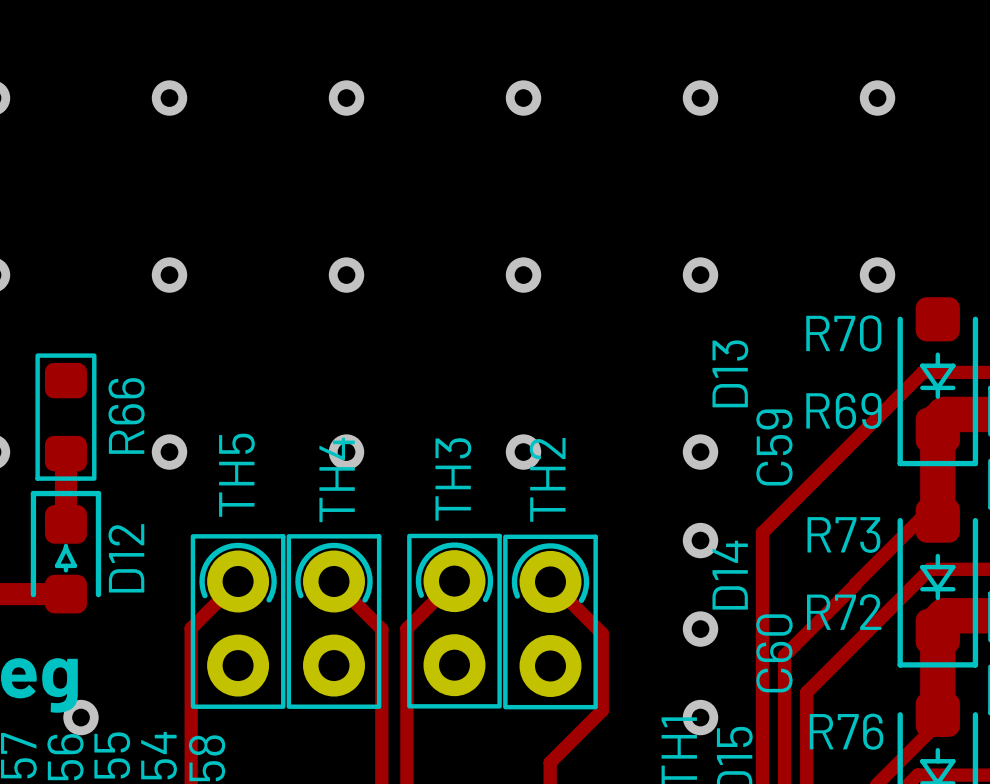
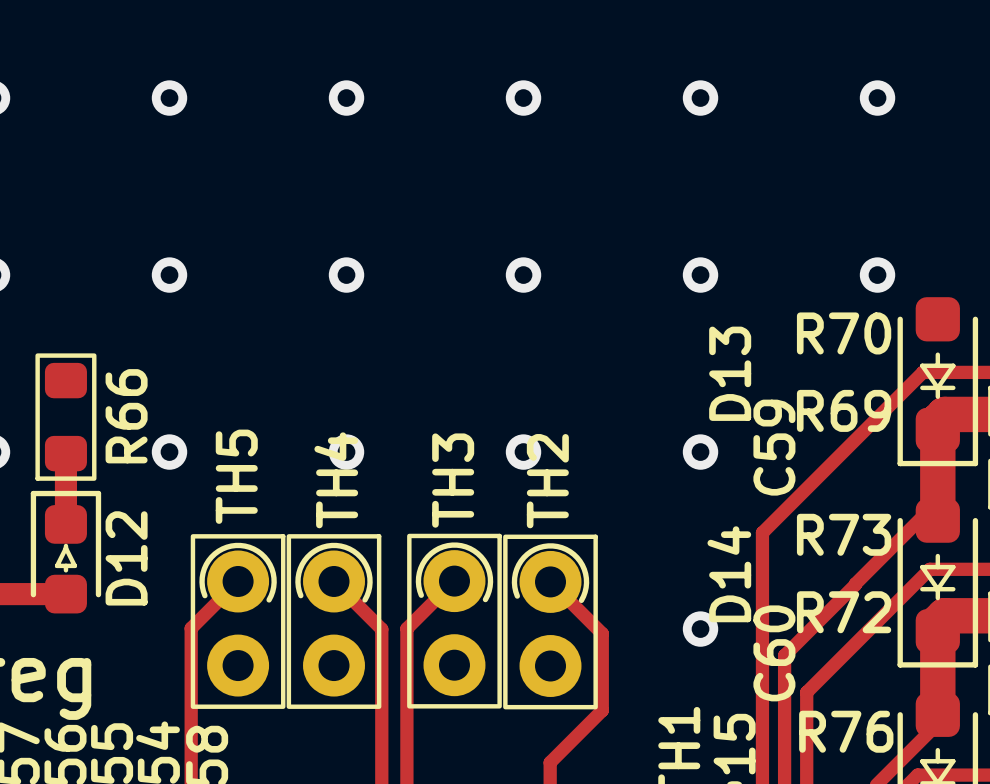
via: (700, 540) -> none
via: (81, 717) -> none
via: (700, 717) -> none

